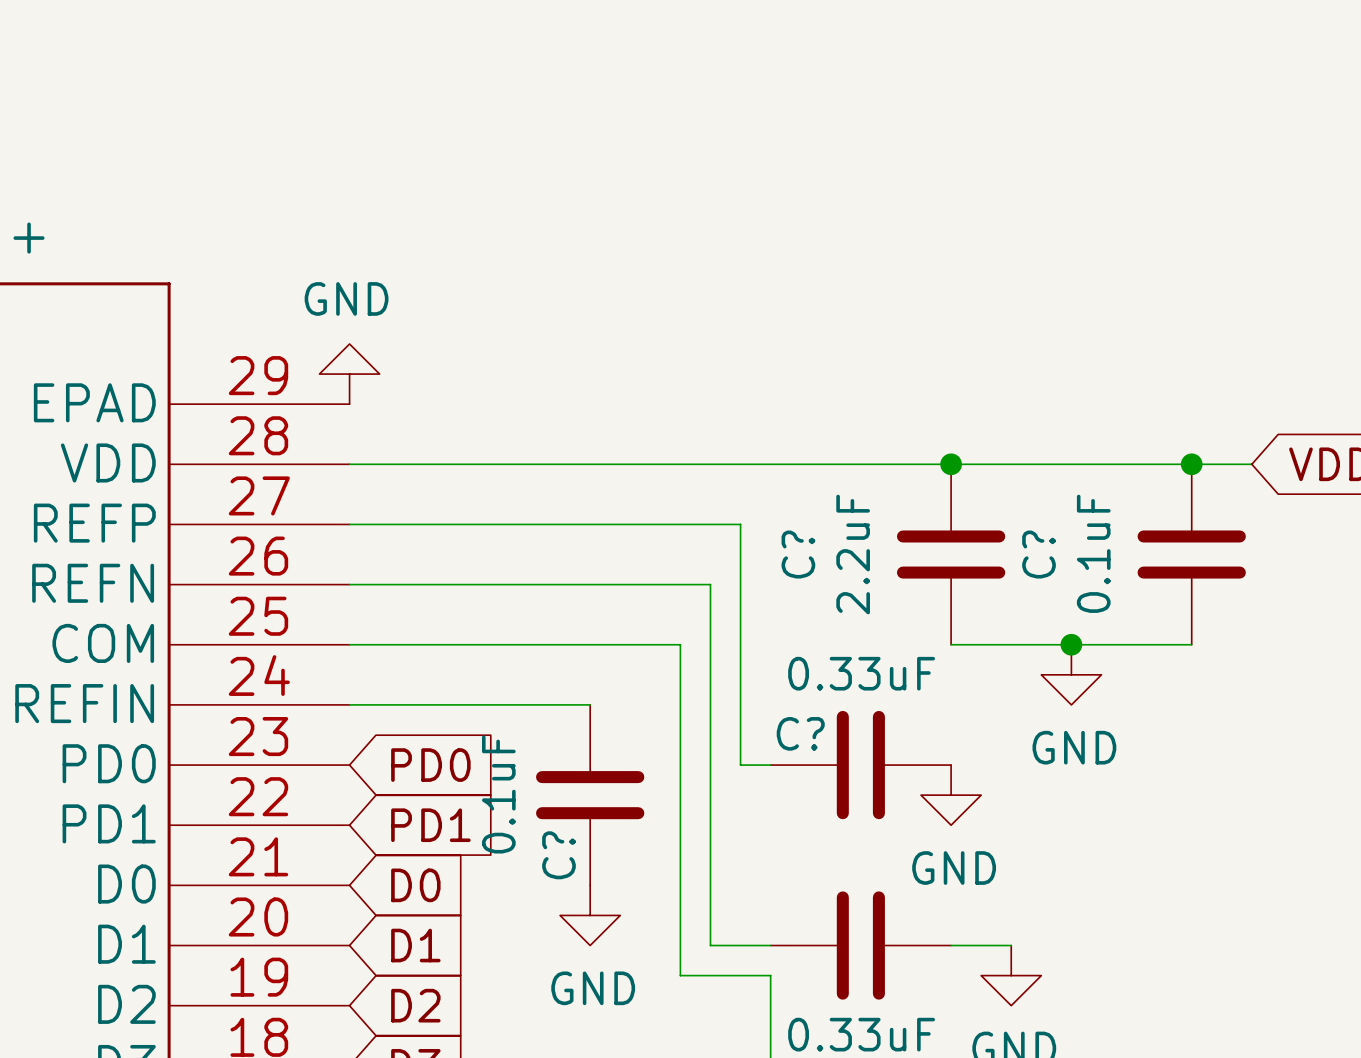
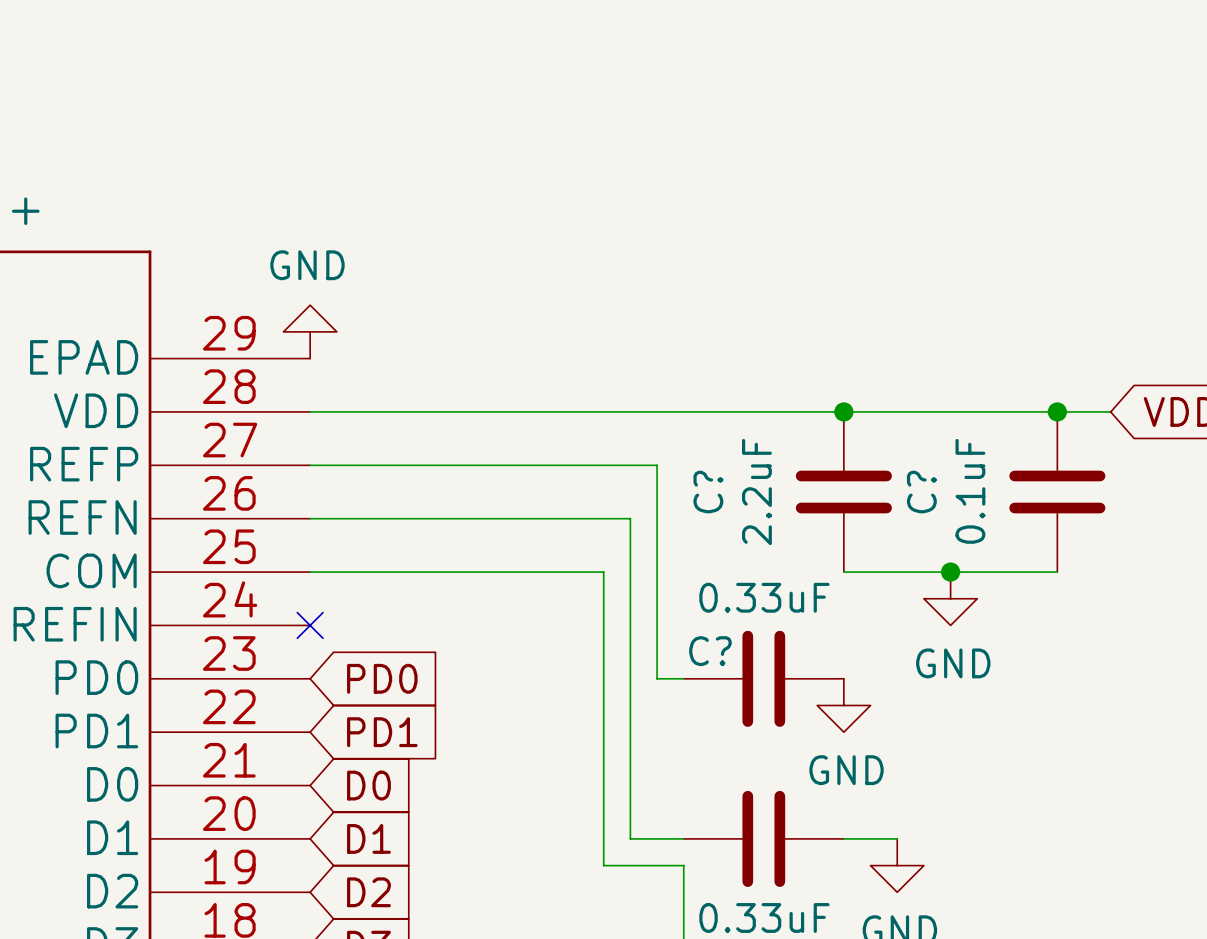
wire: (349, 704) (590, 704) -> none
no-connect mark: none -> (310, 625)
C?: 0.1uF (590, 795) -> none
power symbol: GND (590, 915) -> none

